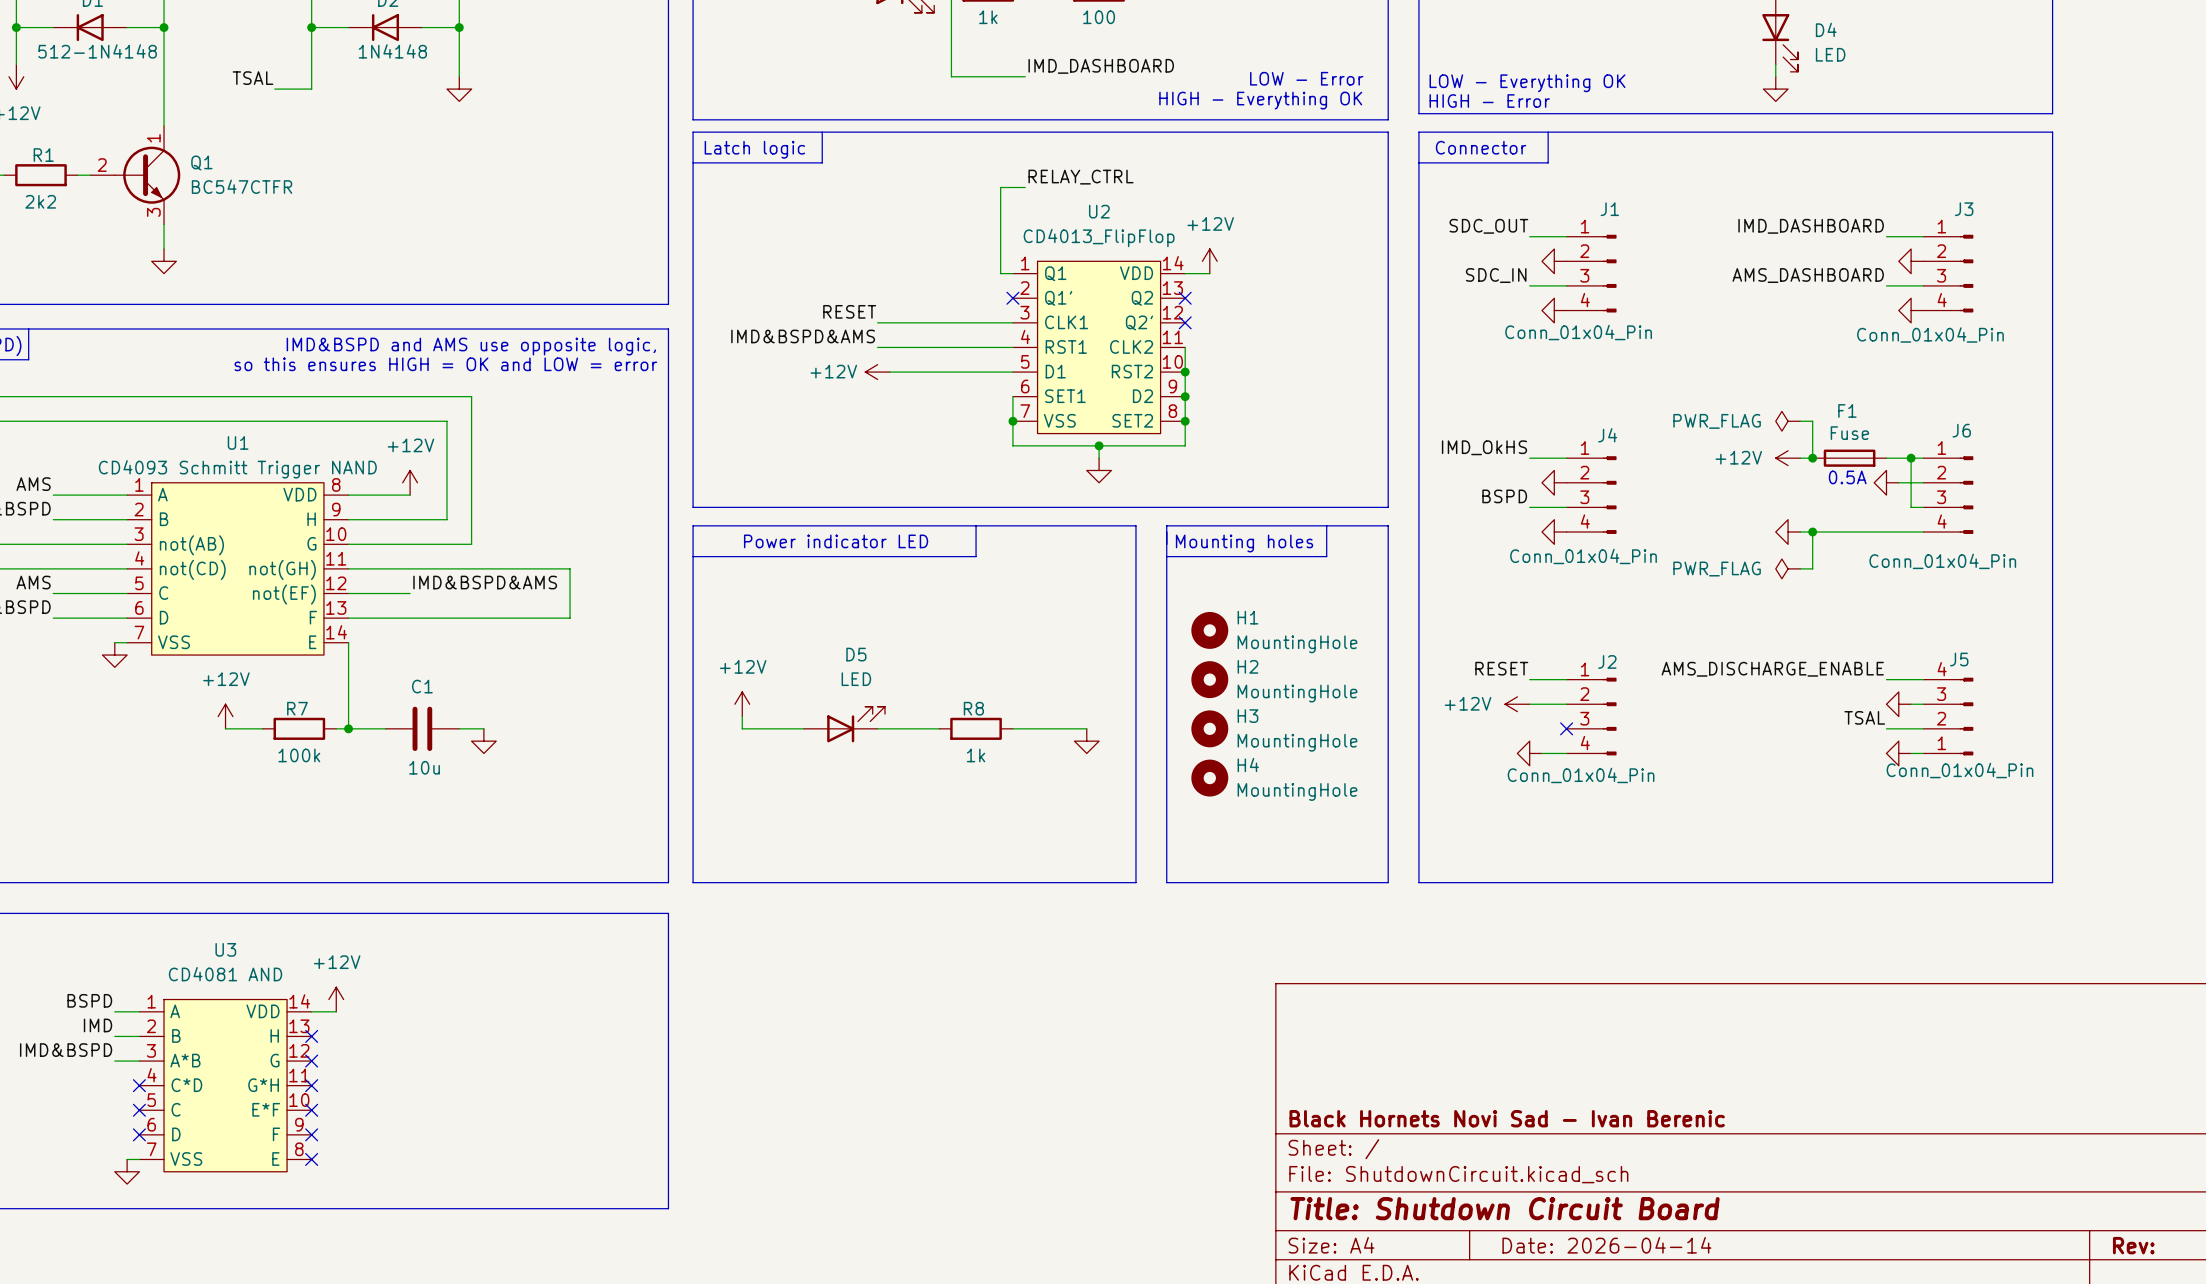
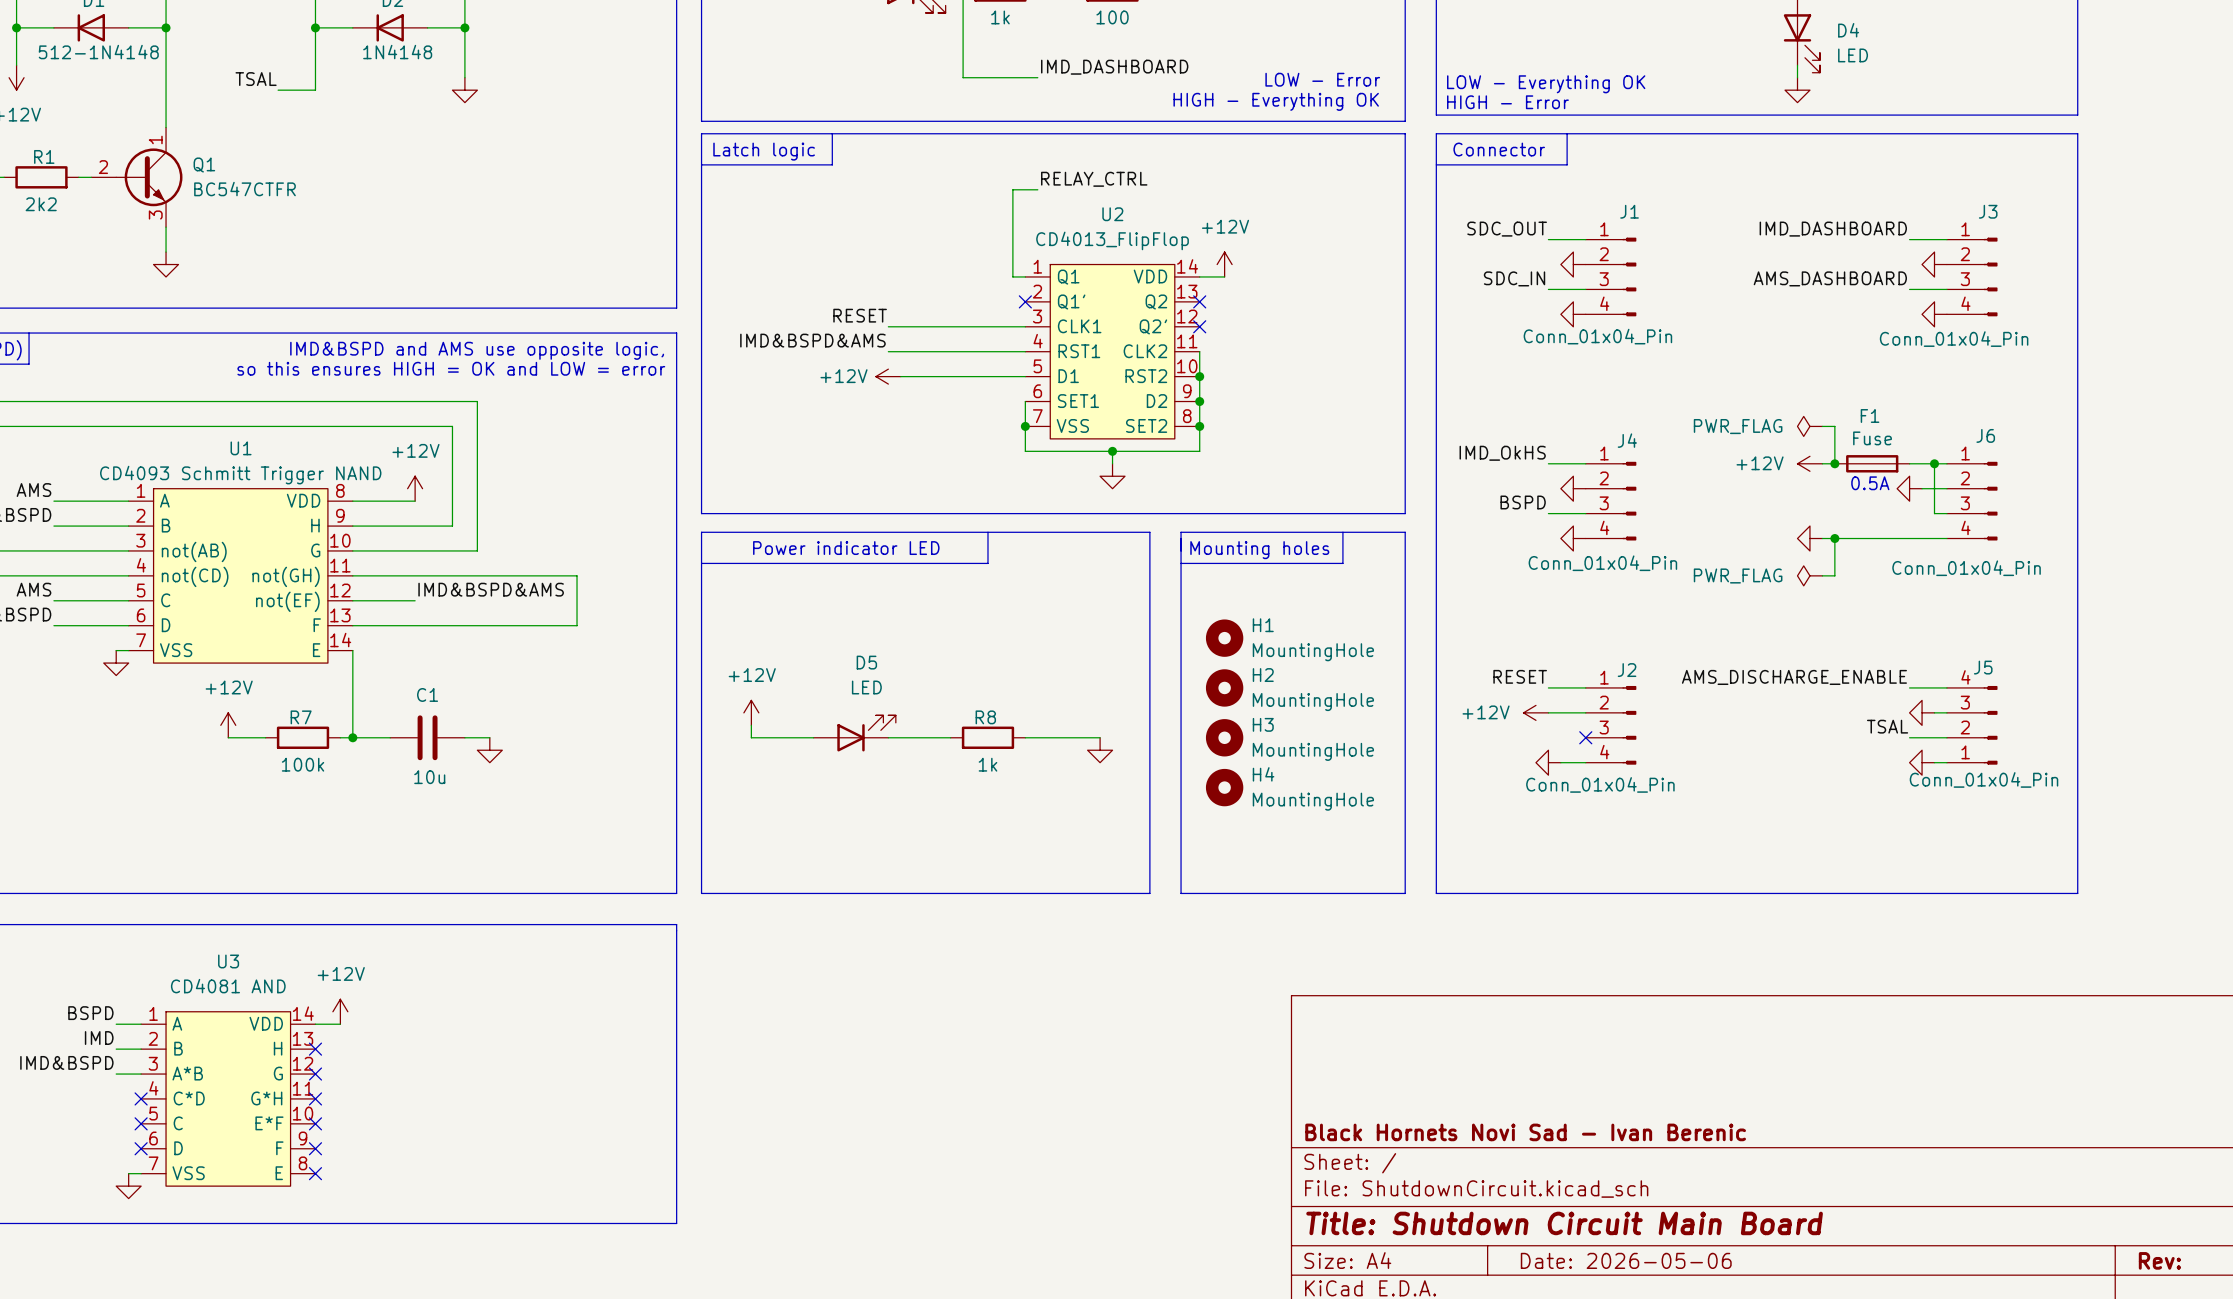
title block: Title: Shutdown Circuit Board (1505, 1208) -> Title: Shutdown Circuit Main Board (1564, 1223)
title block: Date: 2026-04-14 (1606, 1245) -> Date: 2026-05-06 (1626, 1260)

